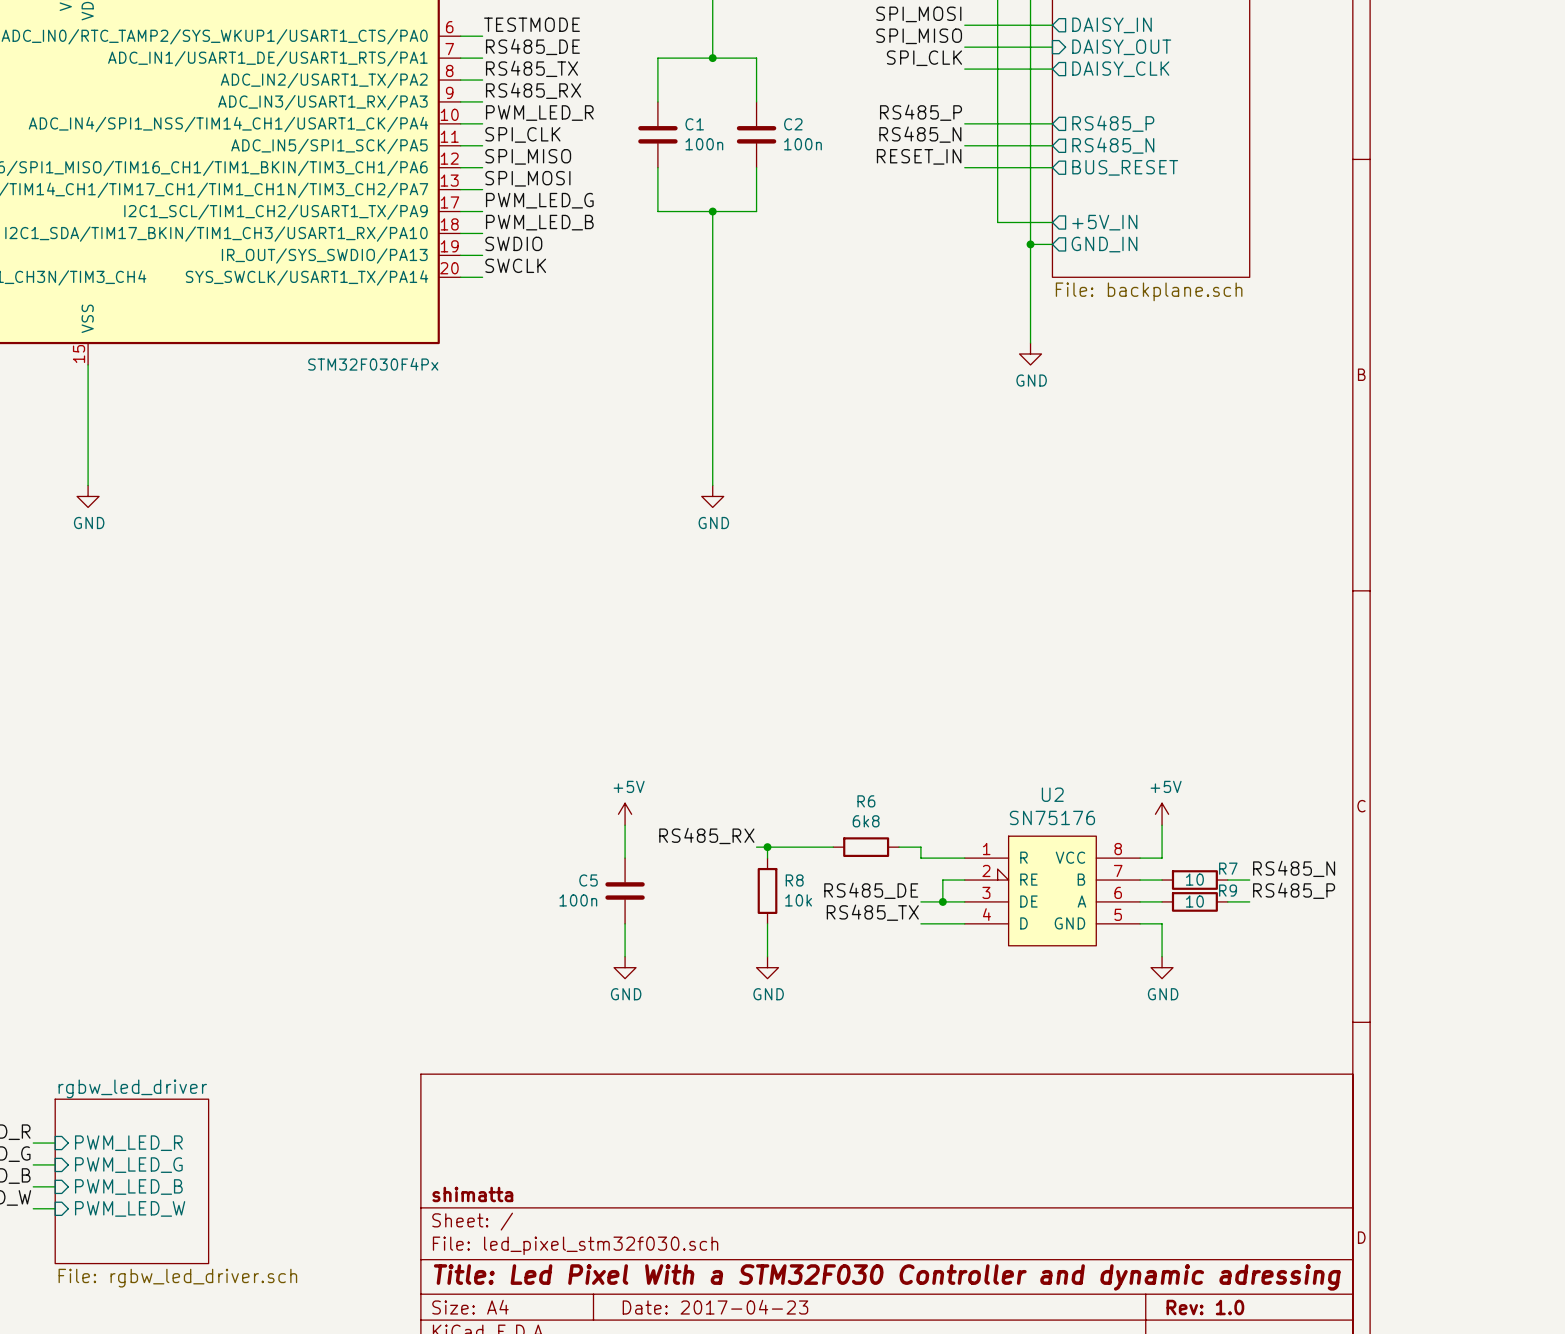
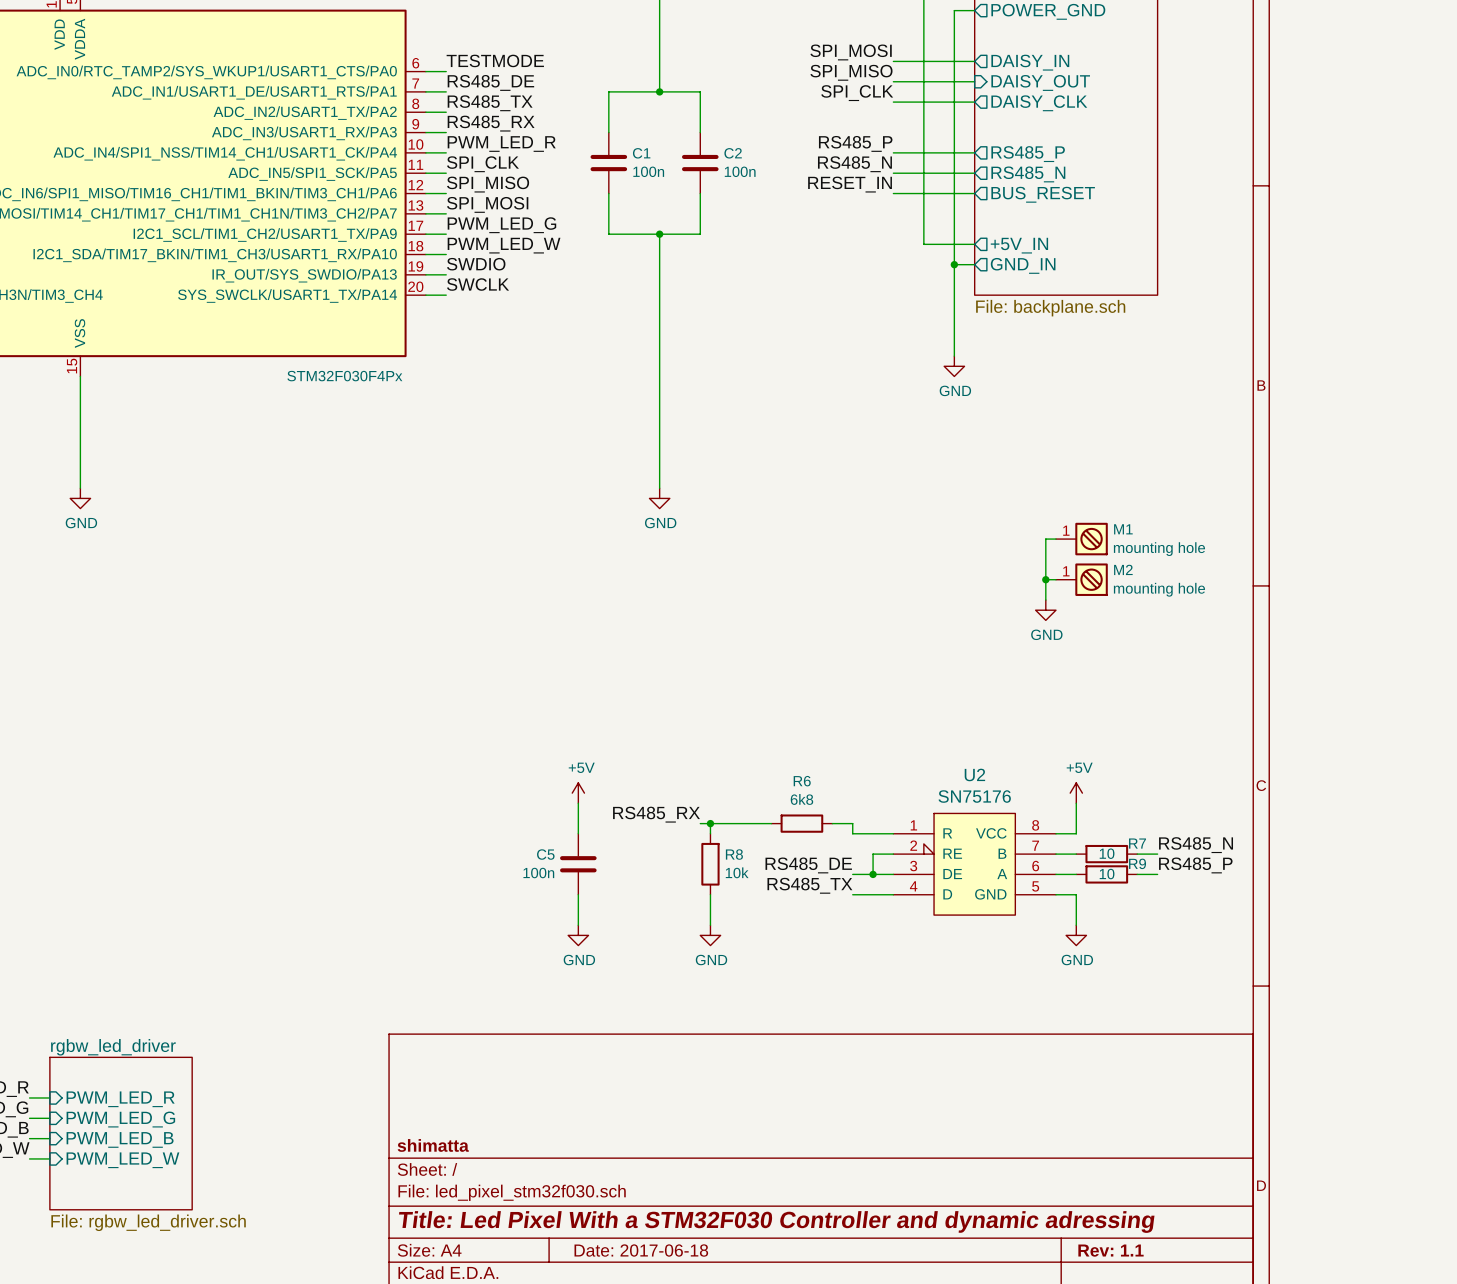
label: PWM_LED_B (539, 222) -> PWM_LED_W (504, 245)
wire: none -> (1055, 539) (1045, 539) (1045, 600)
M1: none -> mounting hole (1081, 539)
wire: none -> (1045, 579) (1055, 579)
junction: none -> (1045, 579)
M2: none -> mounting hole (1081, 579)
power symbol: none -> GND (1045, 610)
title block: Date: 2017-04-23 (715, 1307) -> Date: 2017-06-18 (641, 1250)
title block: Rev: 1.0 (1205, 1307) -> Rev: 1.1 (1111, 1250)

